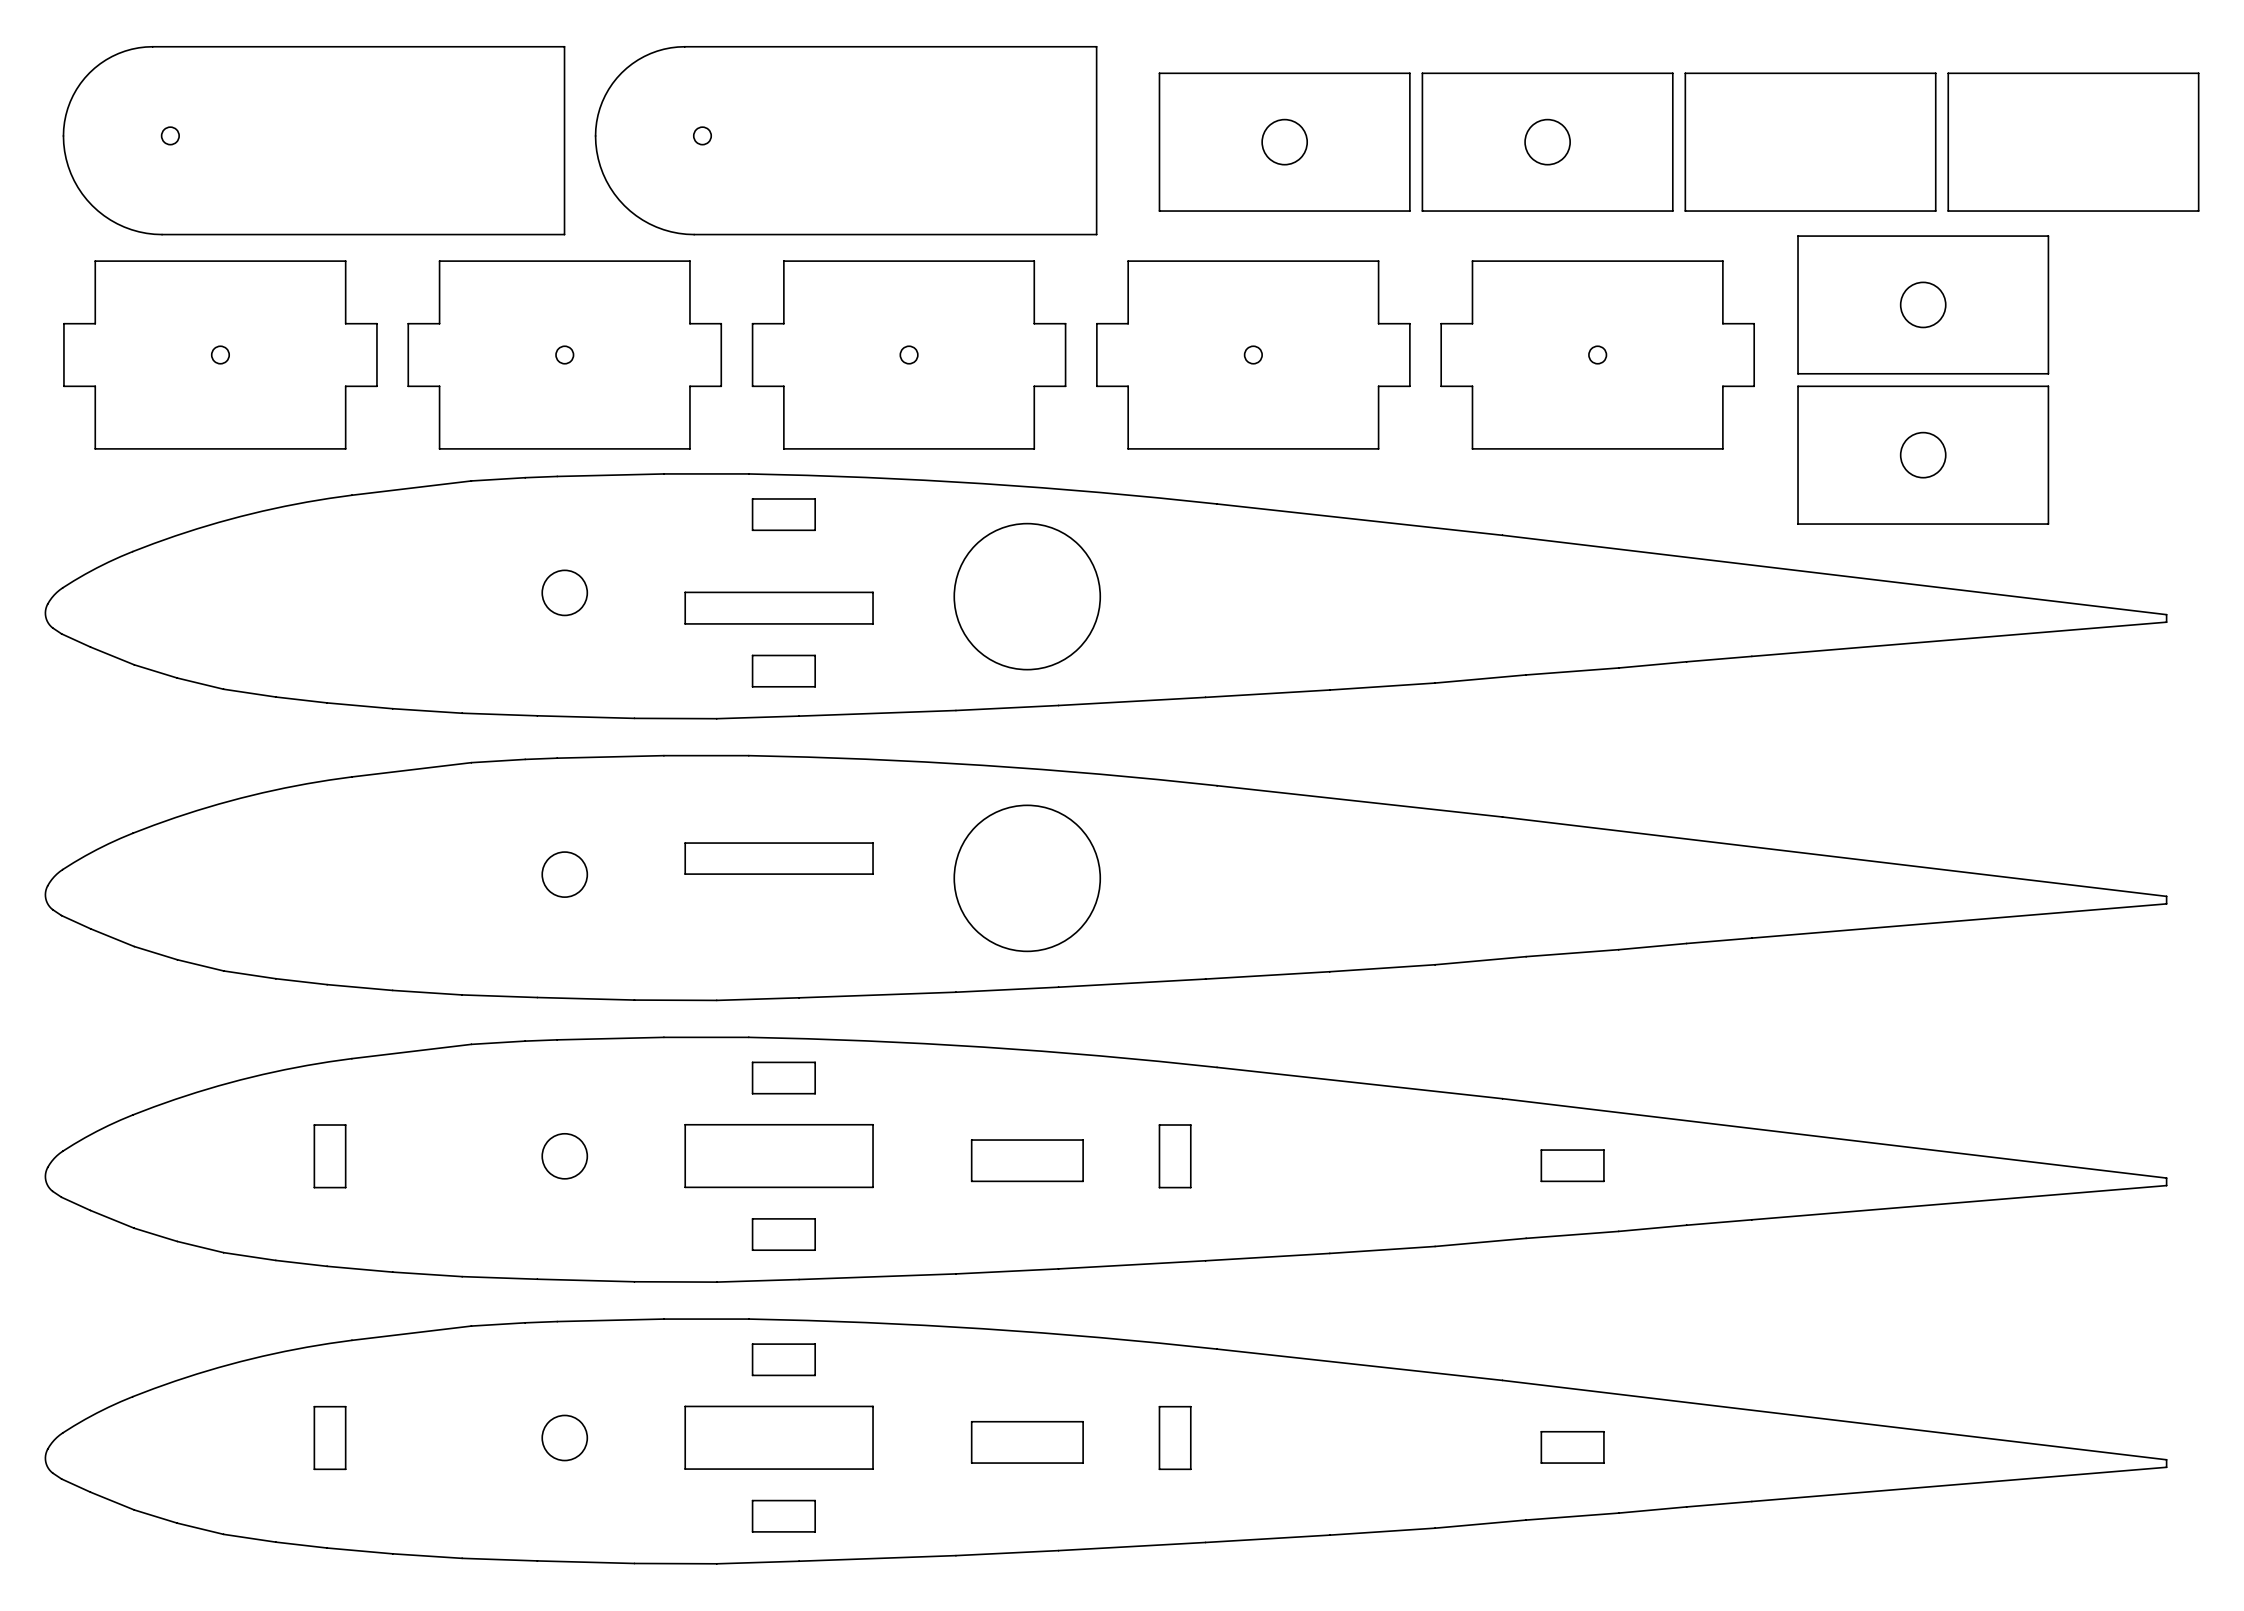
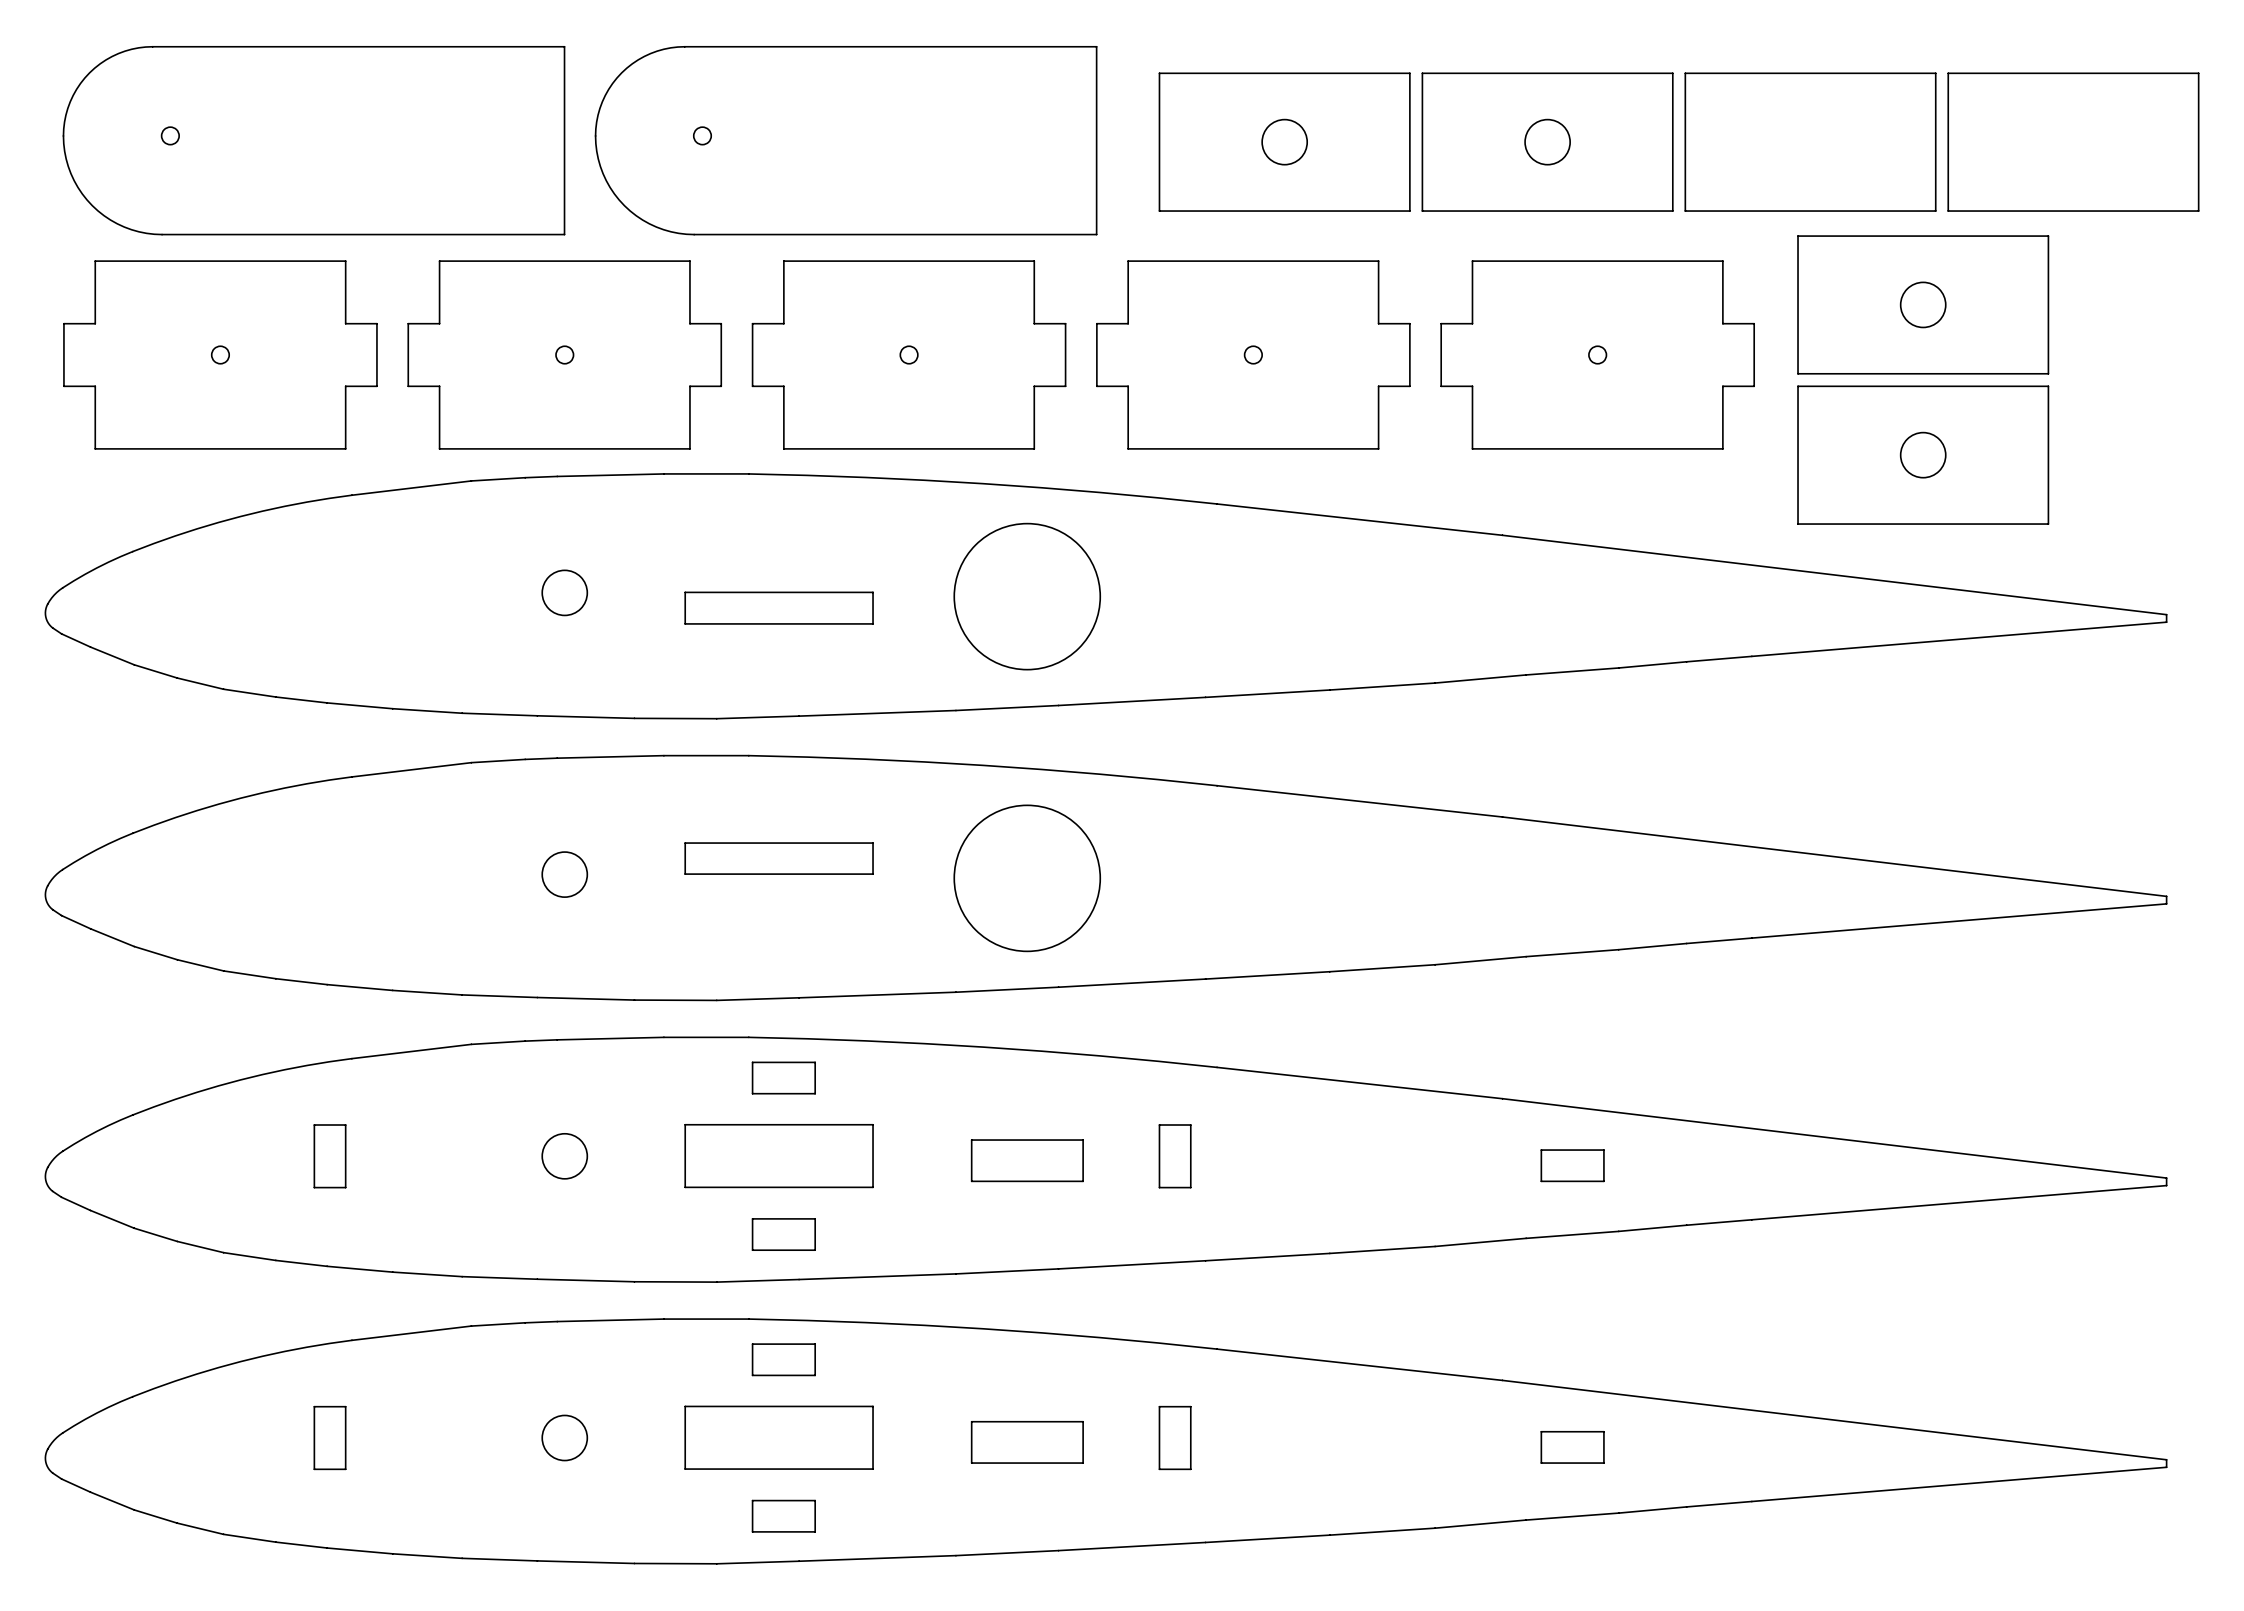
drawing shape: [44, 46, 2200, 1565] -> [44, 46, 2200, 1565]

